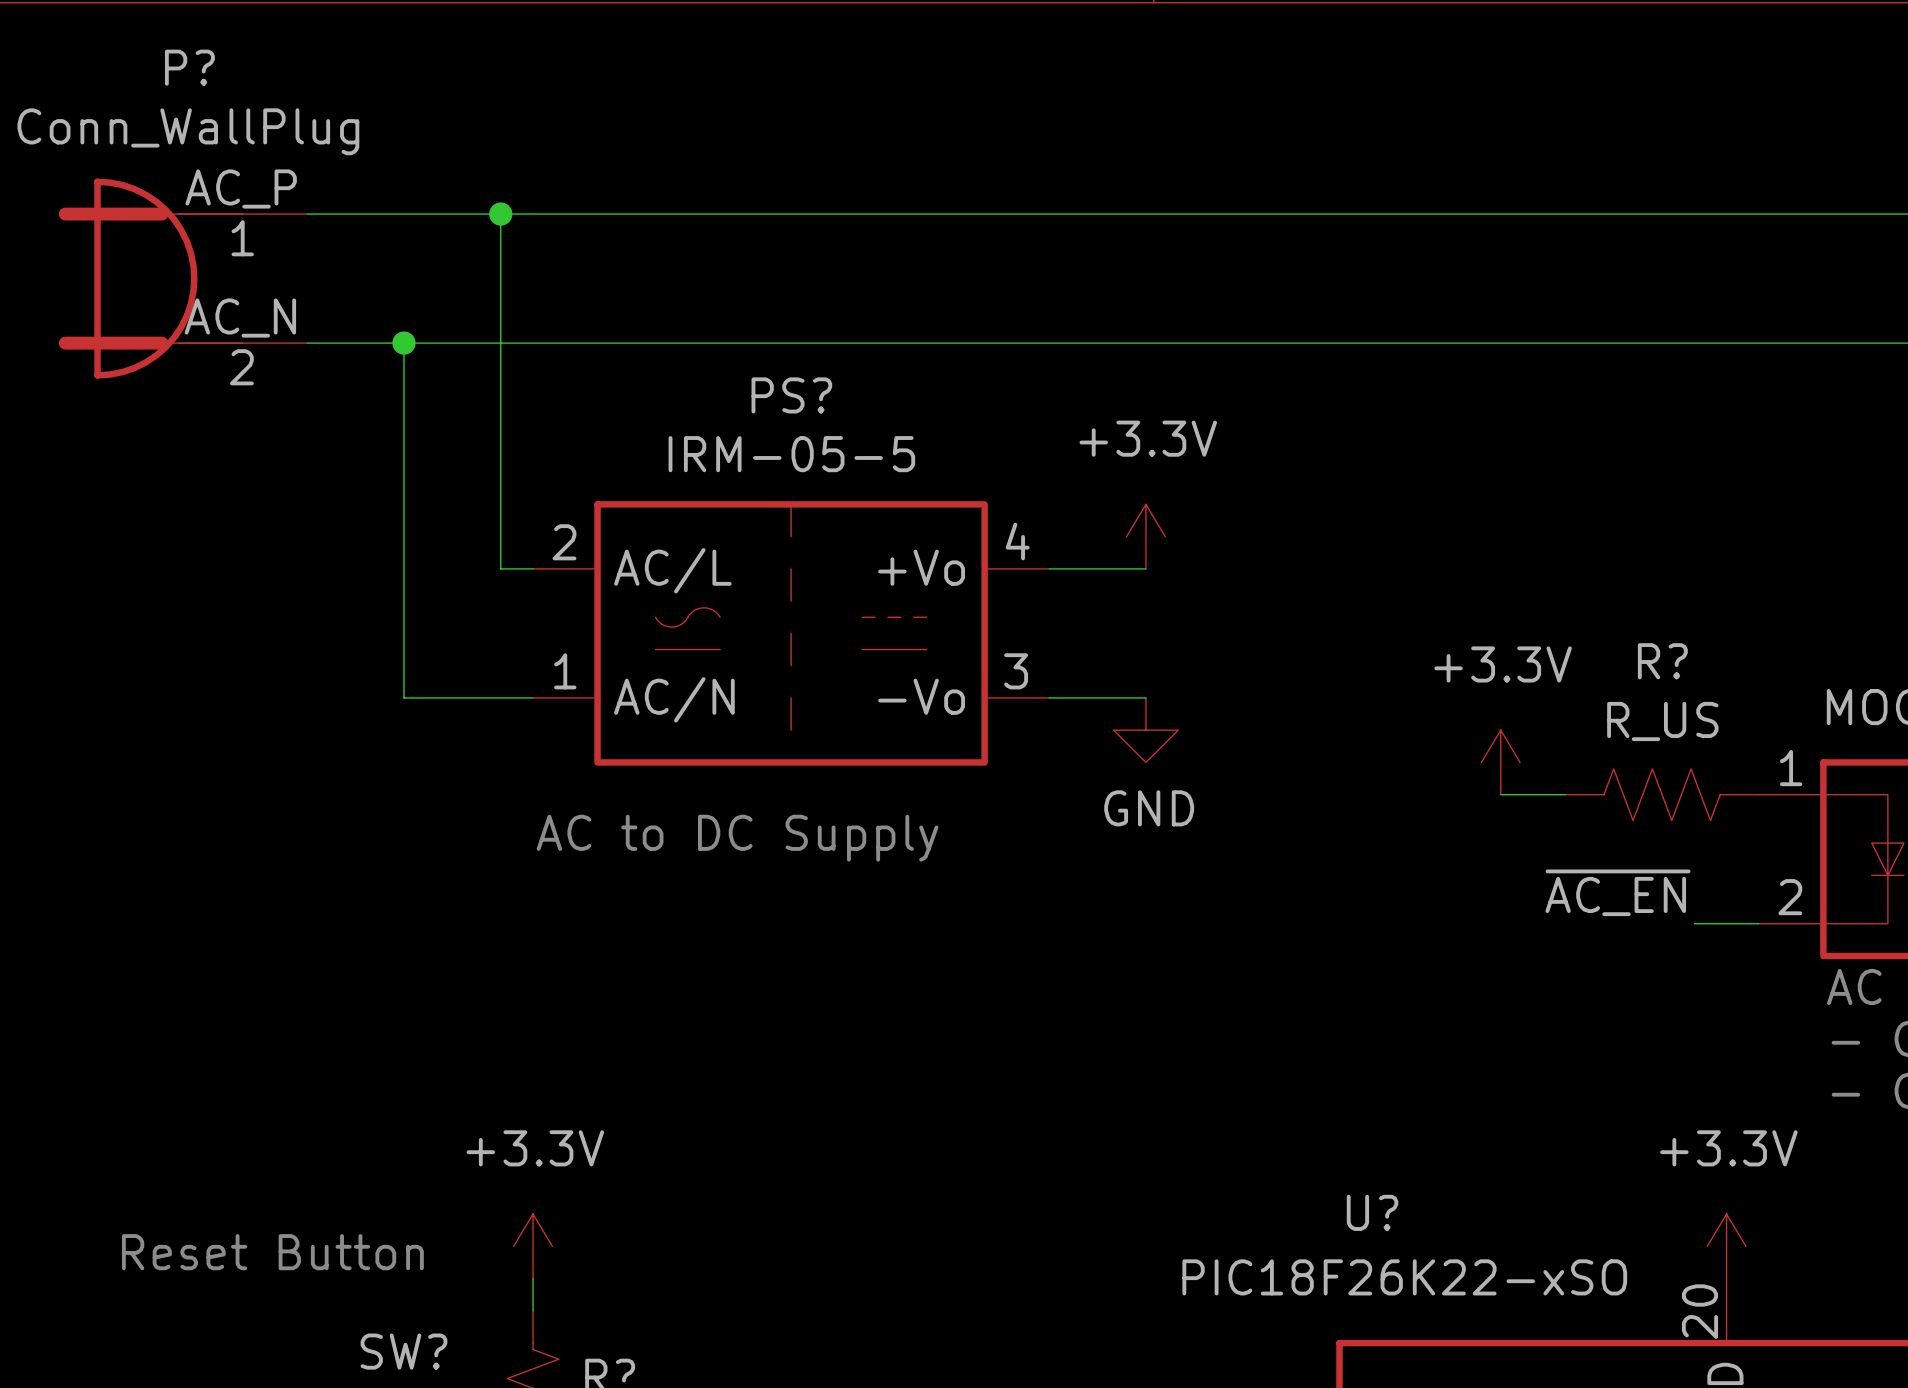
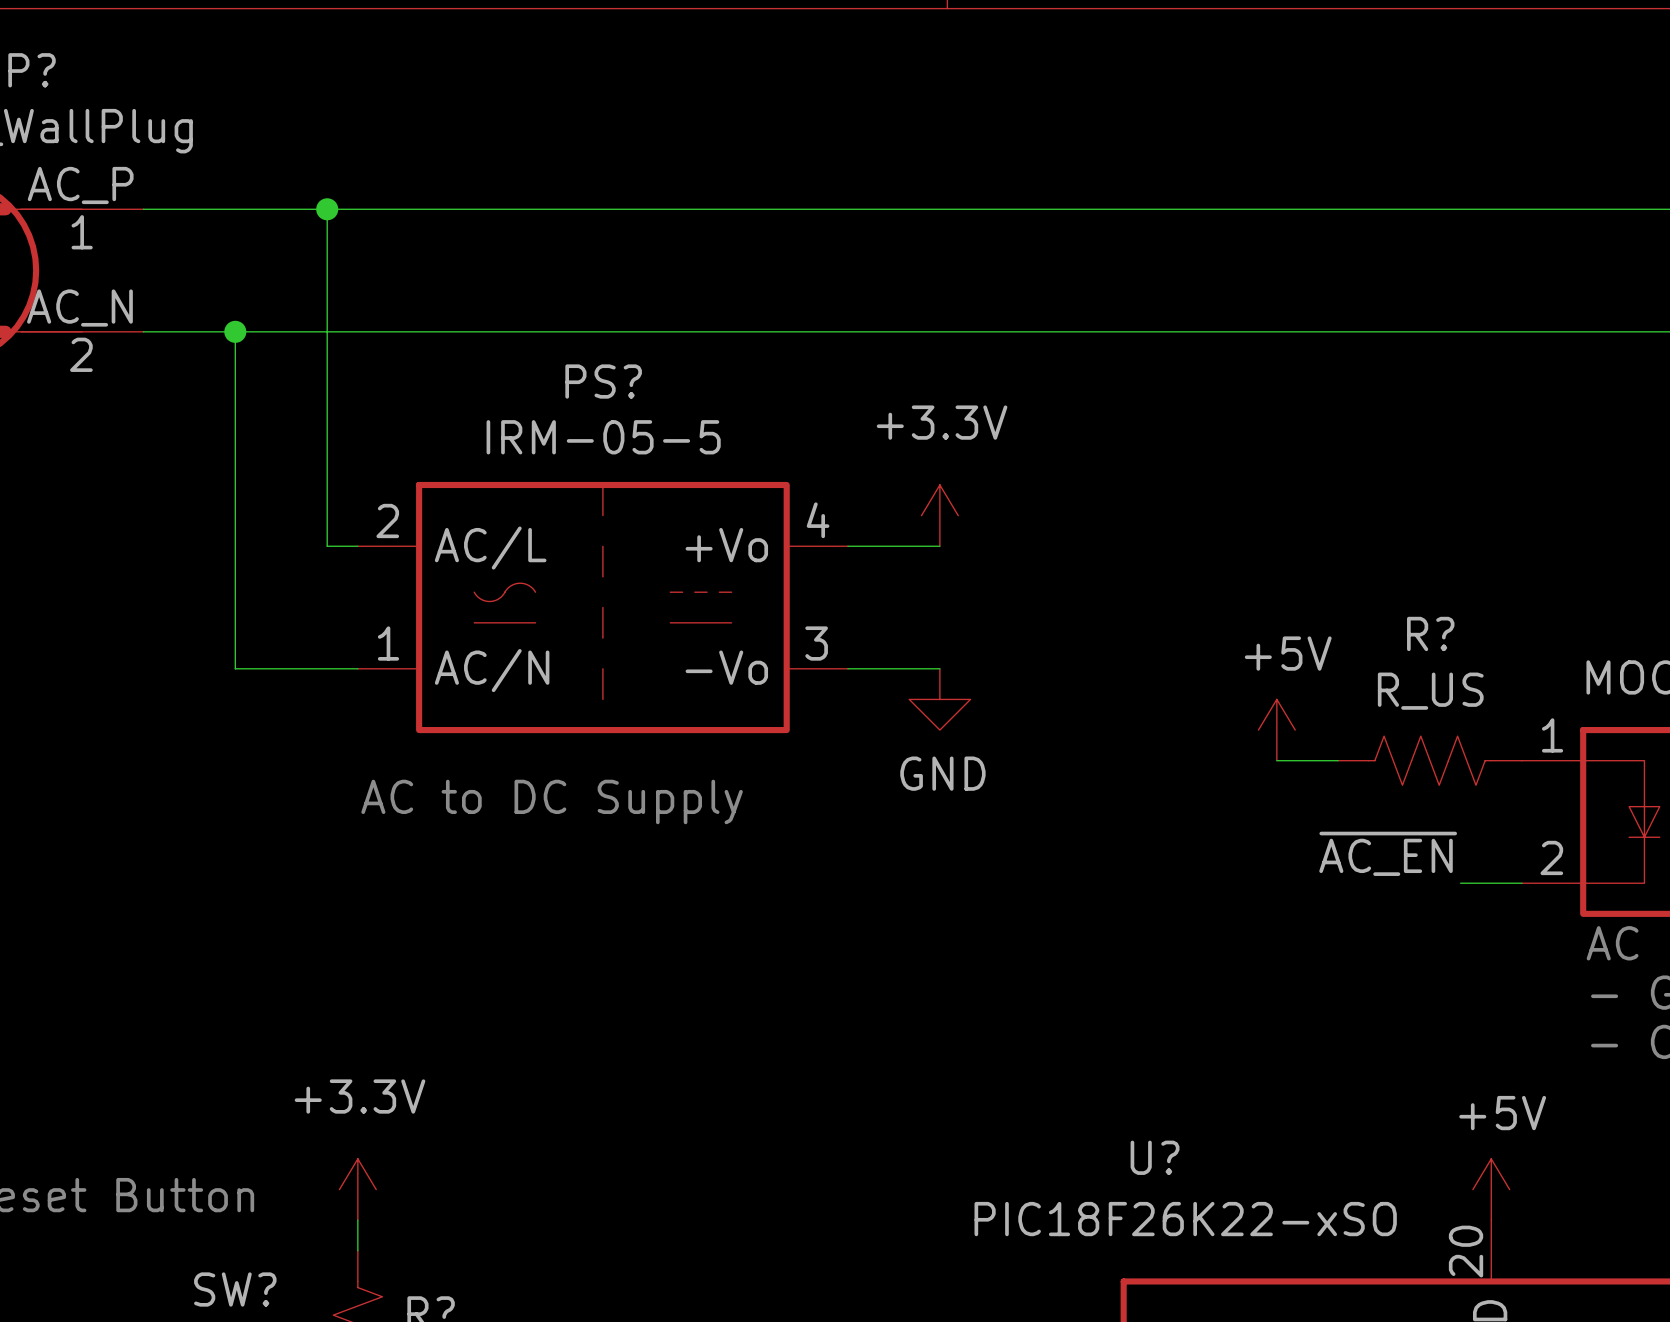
power symbol: +3.3V (1500, 762) -> +5V (1276, 730)
power symbol: +3.3V (1726, 1246) -> +5V (1491, 1189)

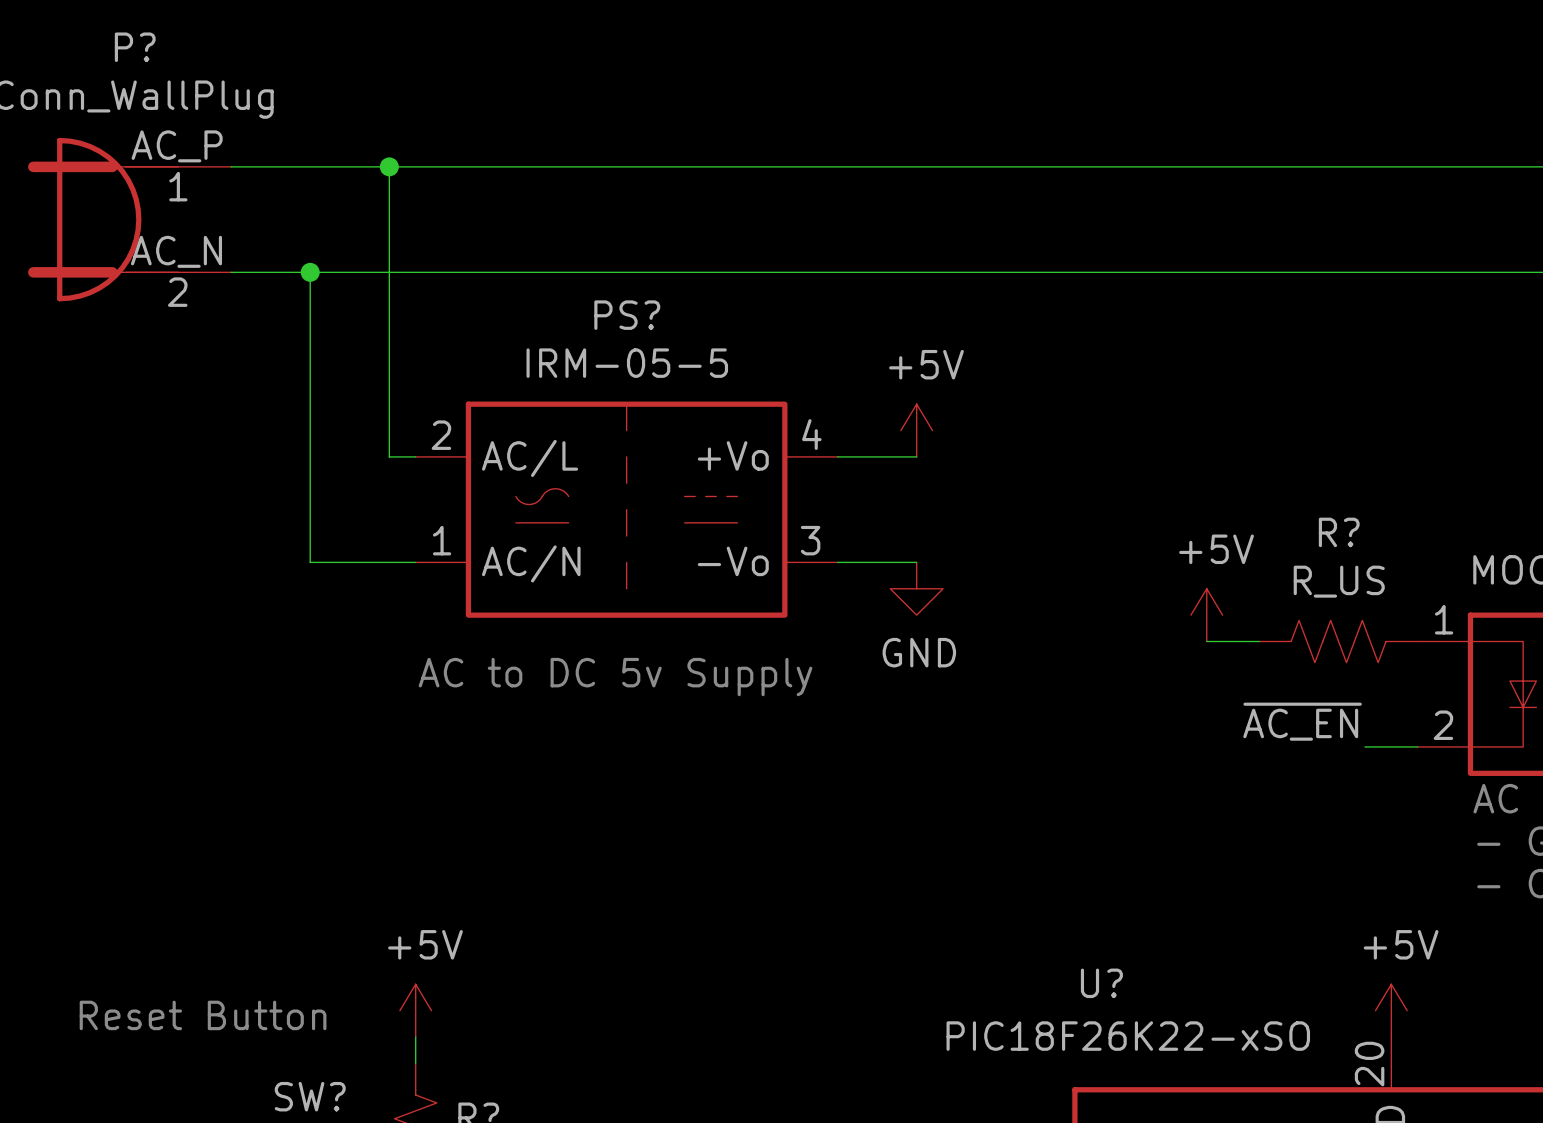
power symbol: +3.3V (939, 515) -> +5V (916, 430)
text: AC to DC Supply (552, 801) -> AC to DC 5v Supply (615, 677)
power symbol: +3.3V (357, 1189) -> +5V (415, 1010)

